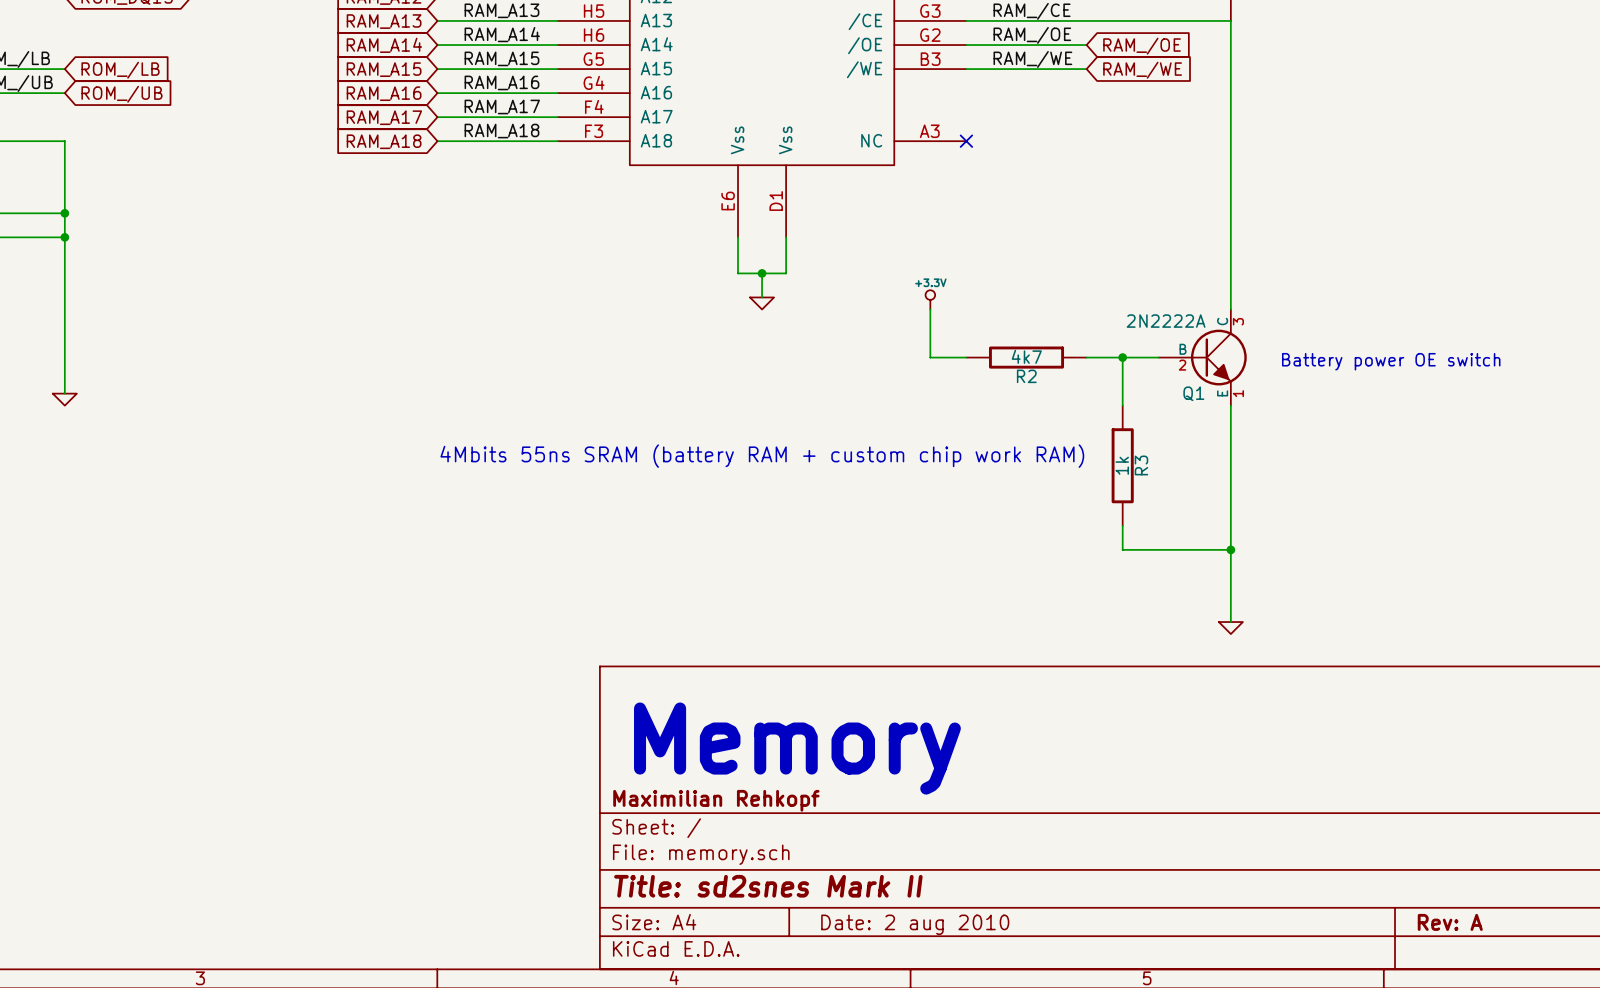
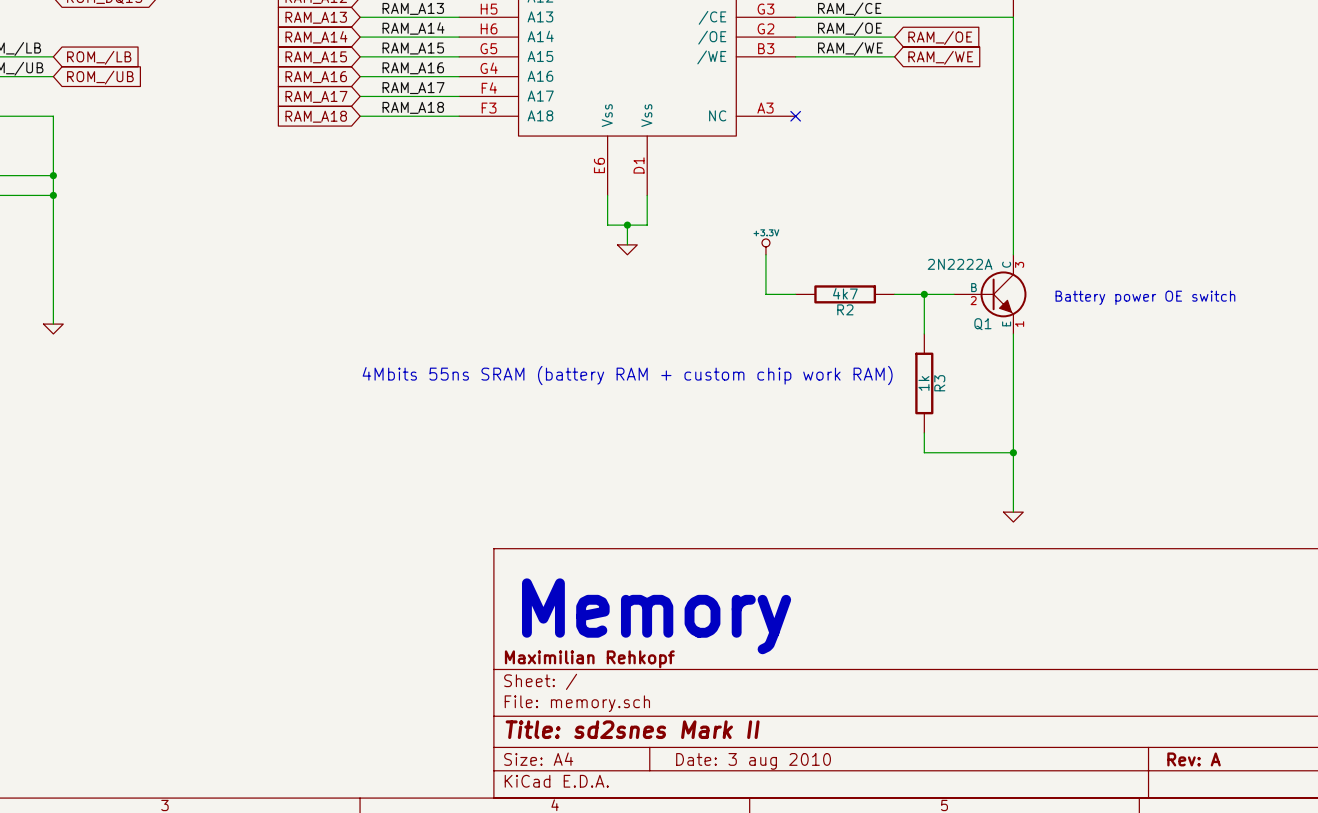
title block: Date: 2 aug 2010 (915, 924) -> Date: 3 aug 2010 (753, 761)

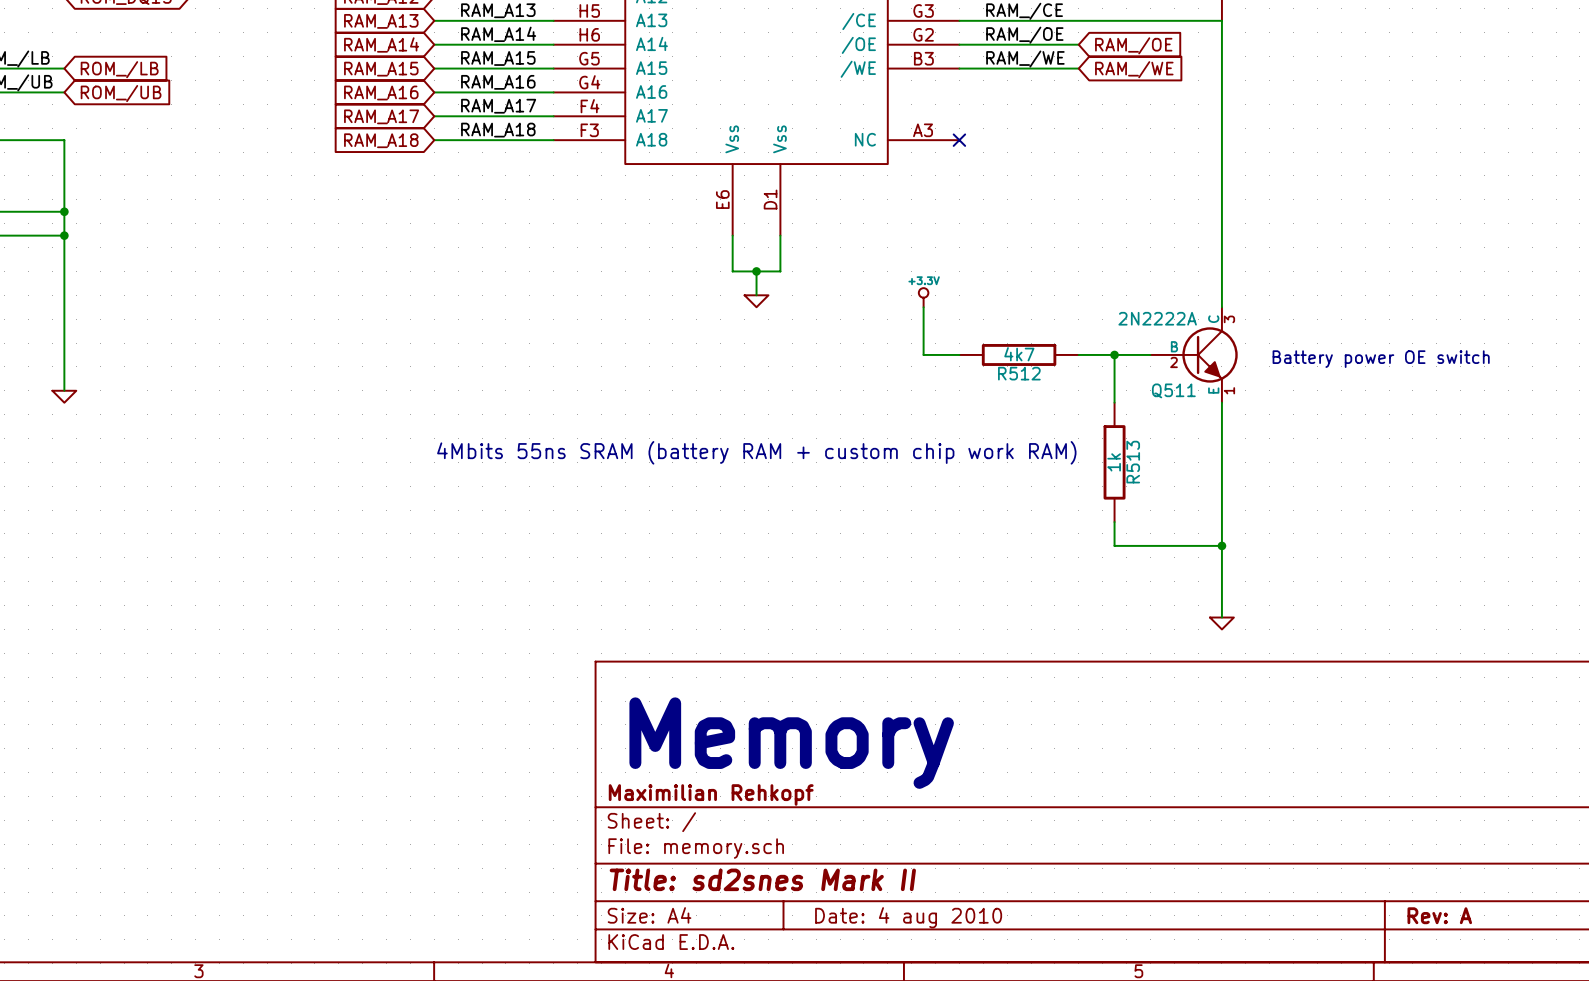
R2 name: R2 (845, 309) -> R512 (1019, 373)
Q1 name: Q1 (982, 324) -> Q511 (1173, 390)
R3 name: R3 (939, 383) -> R513 (1133, 462)
title block: Date: 3 aug 2010 (753, 761) -> Date: 4 aug 2010 (908, 917)

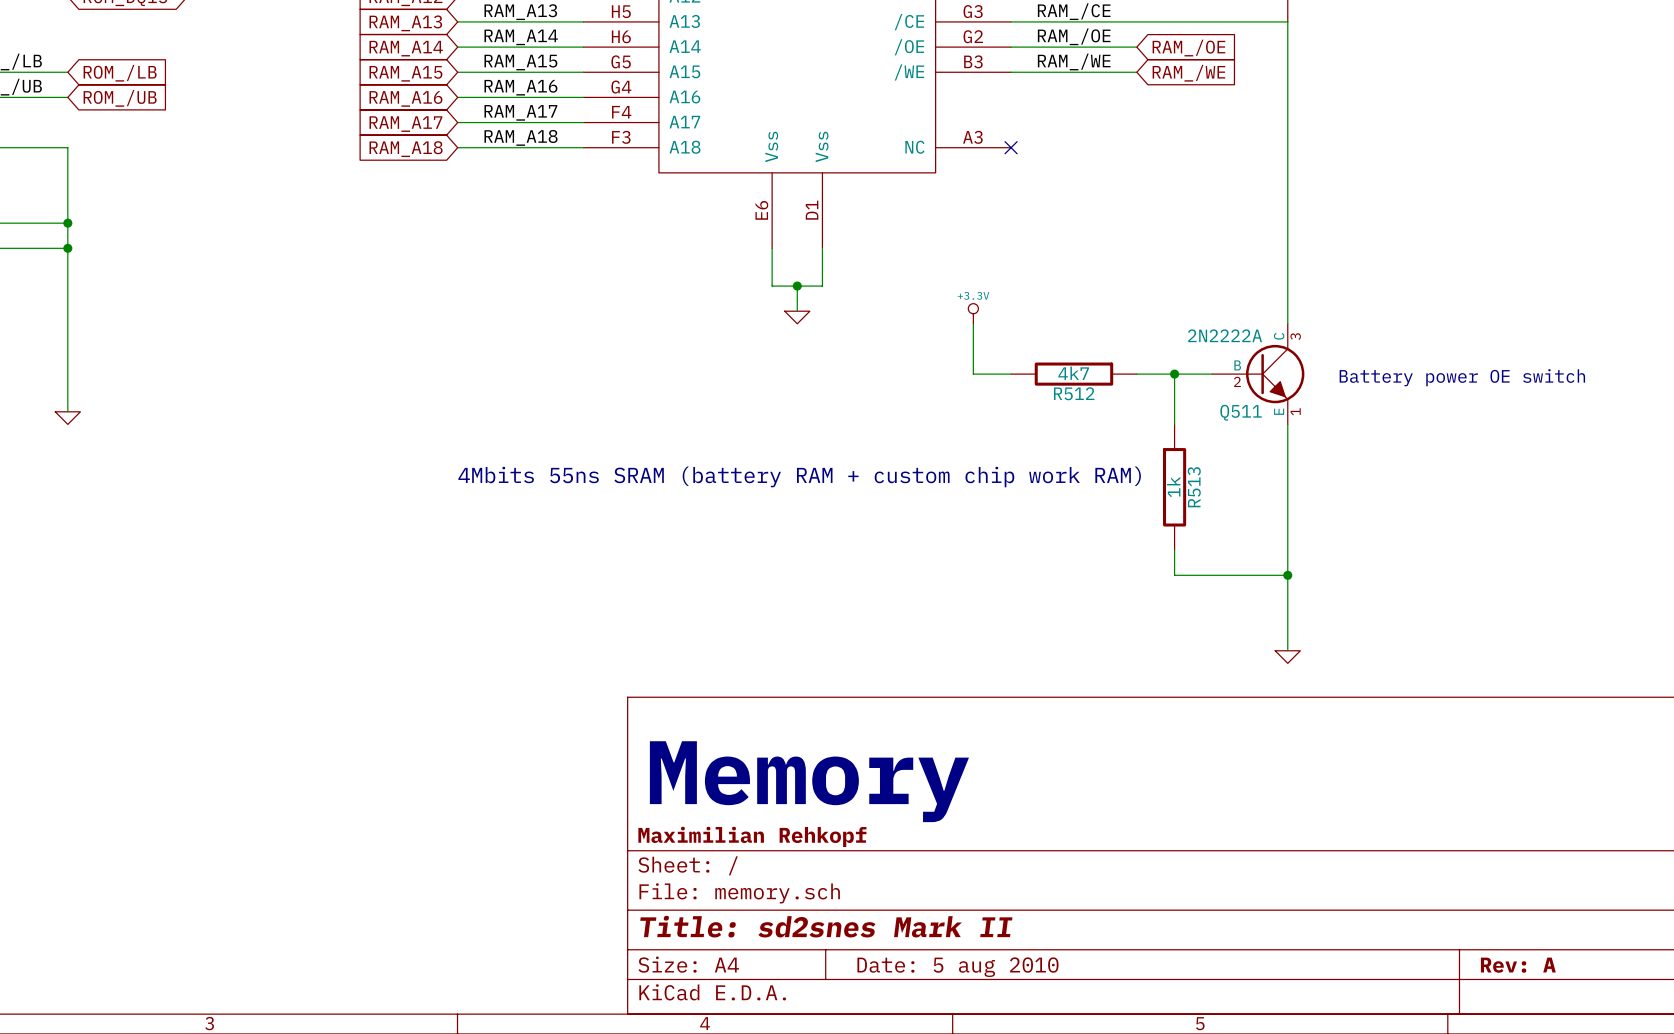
title block: Date: 4 aug 2010 (908, 917) -> Date: 5 aug 2010 (957, 967)

